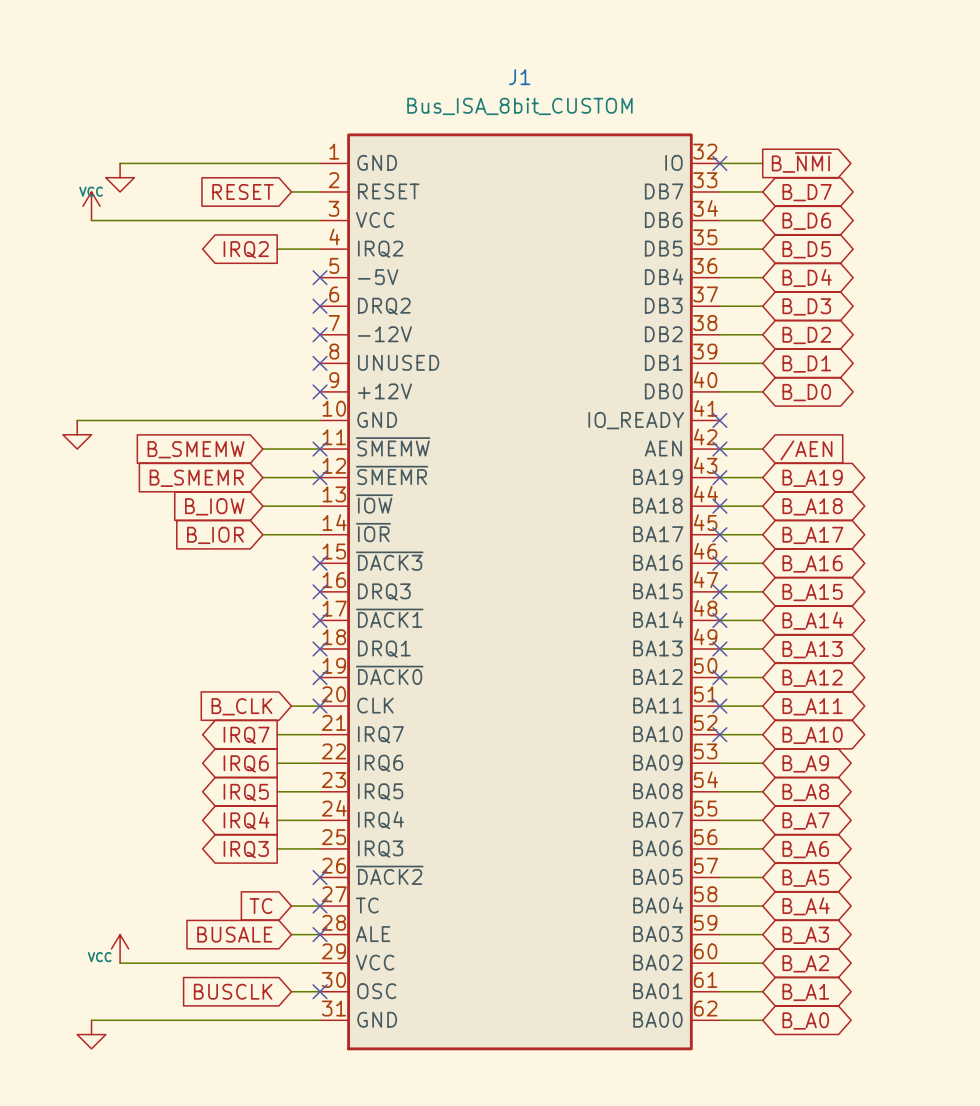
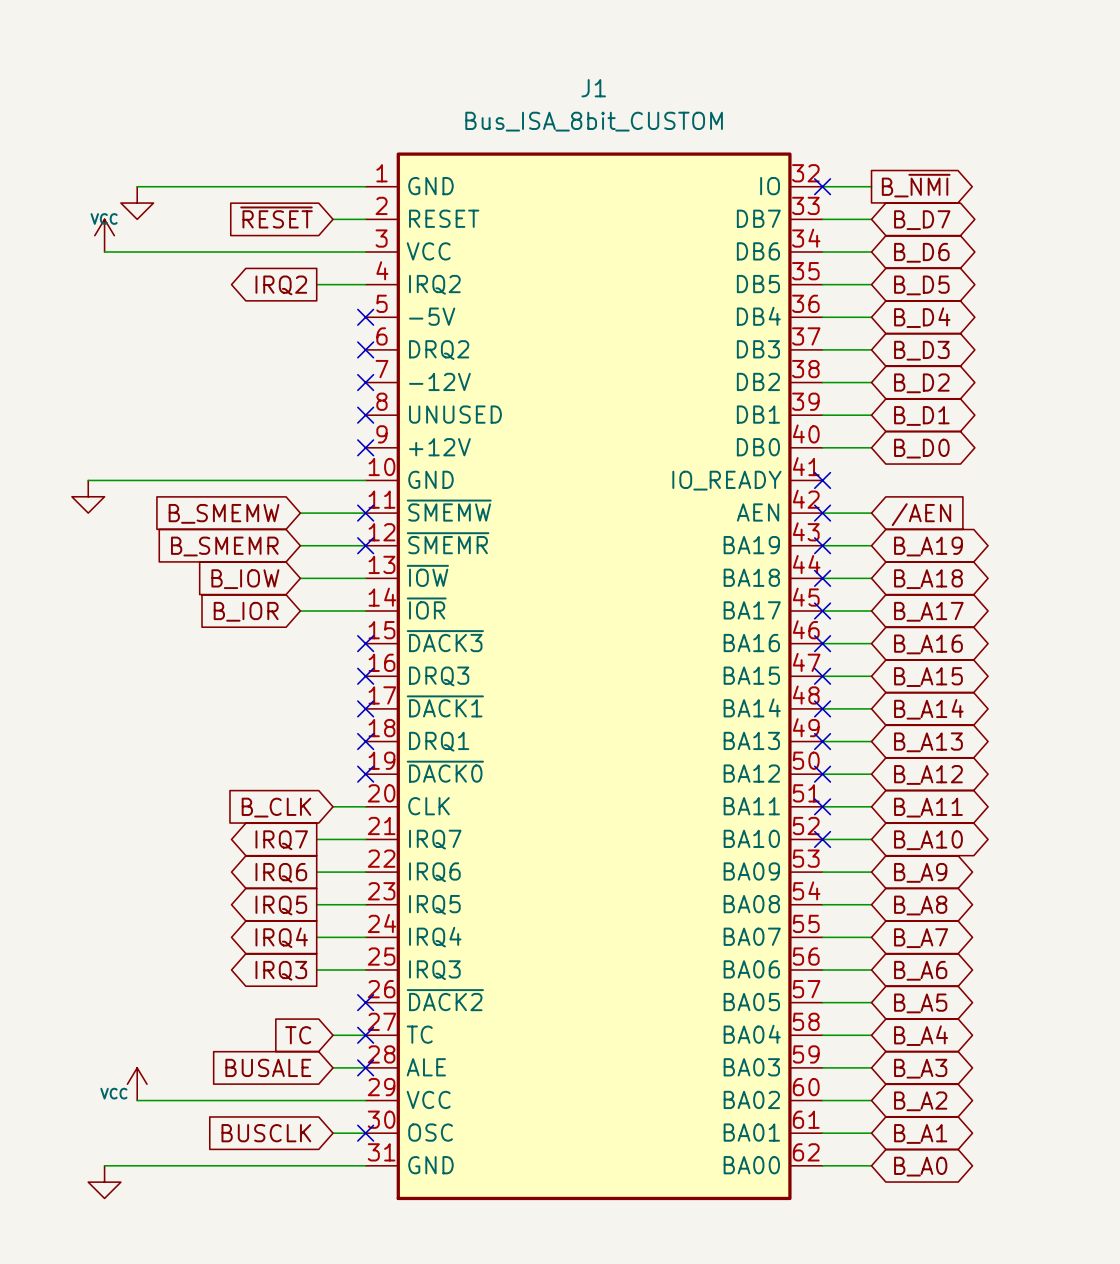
global label: RESET (242, 191) -> ~{RESET} (276, 217)
no-connect mark: (320, 706) -> none

